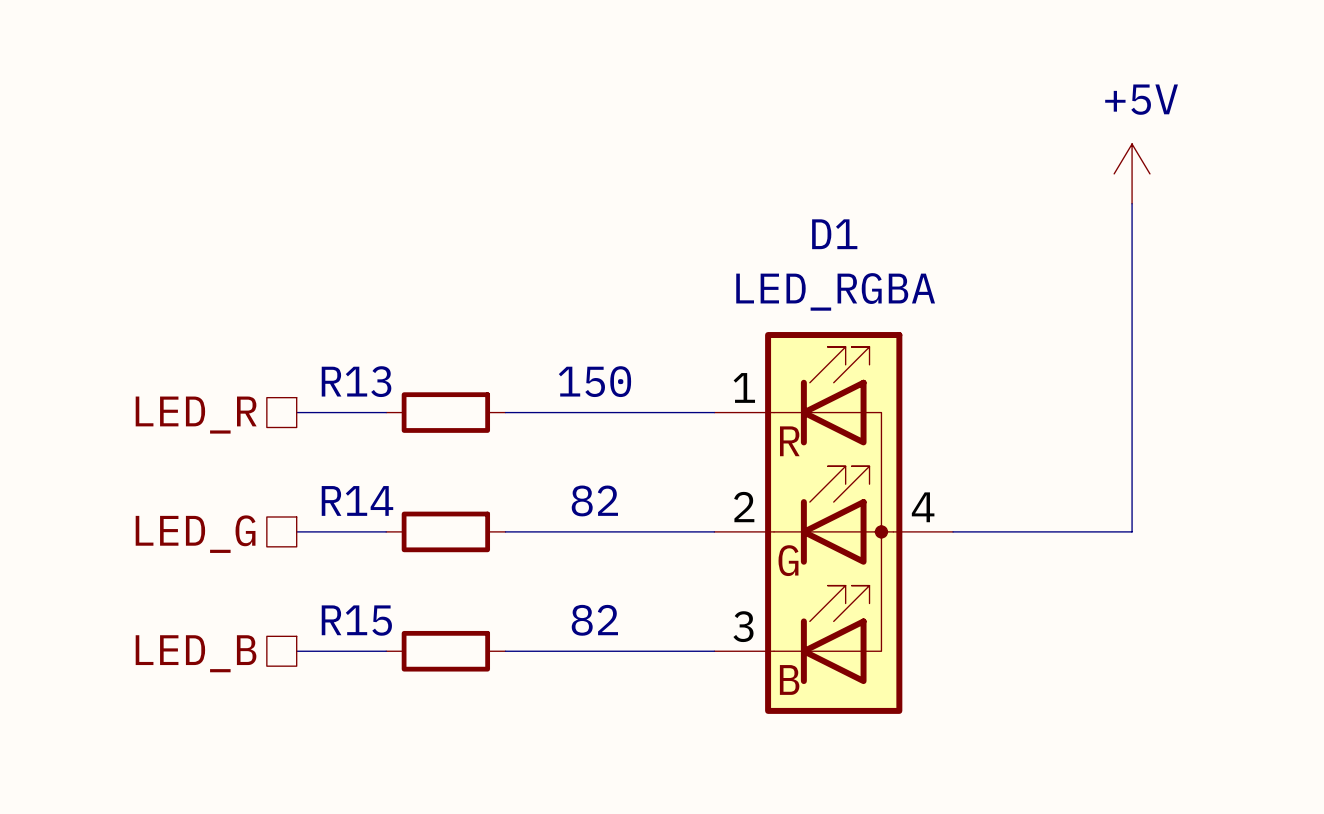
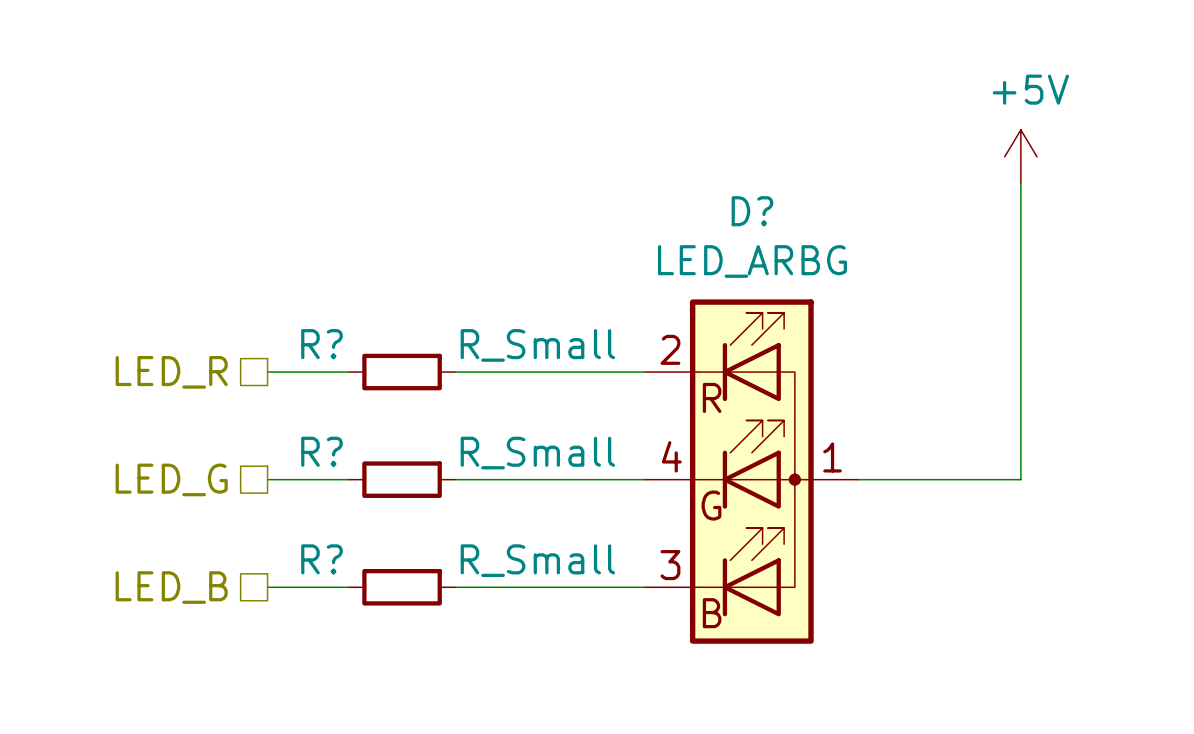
R13 name: R13 (356, 381) -> R? (322, 344)
R13 value: 150 (594, 381) -> R_Small (537, 345)
R14 name: R14 (357, 500) -> R? (322, 451)
R14 value: 82 (594, 500) -> R_Small (537, 453)
D1: LED_RGBA (833, 522) -> none
D?: none -> LED_ARBG (751, 471)
R15 name: R15 (356, 620) -> R? (322, 559)
R15 value: 82 (594, 620) -> R_Small (537, 560)

